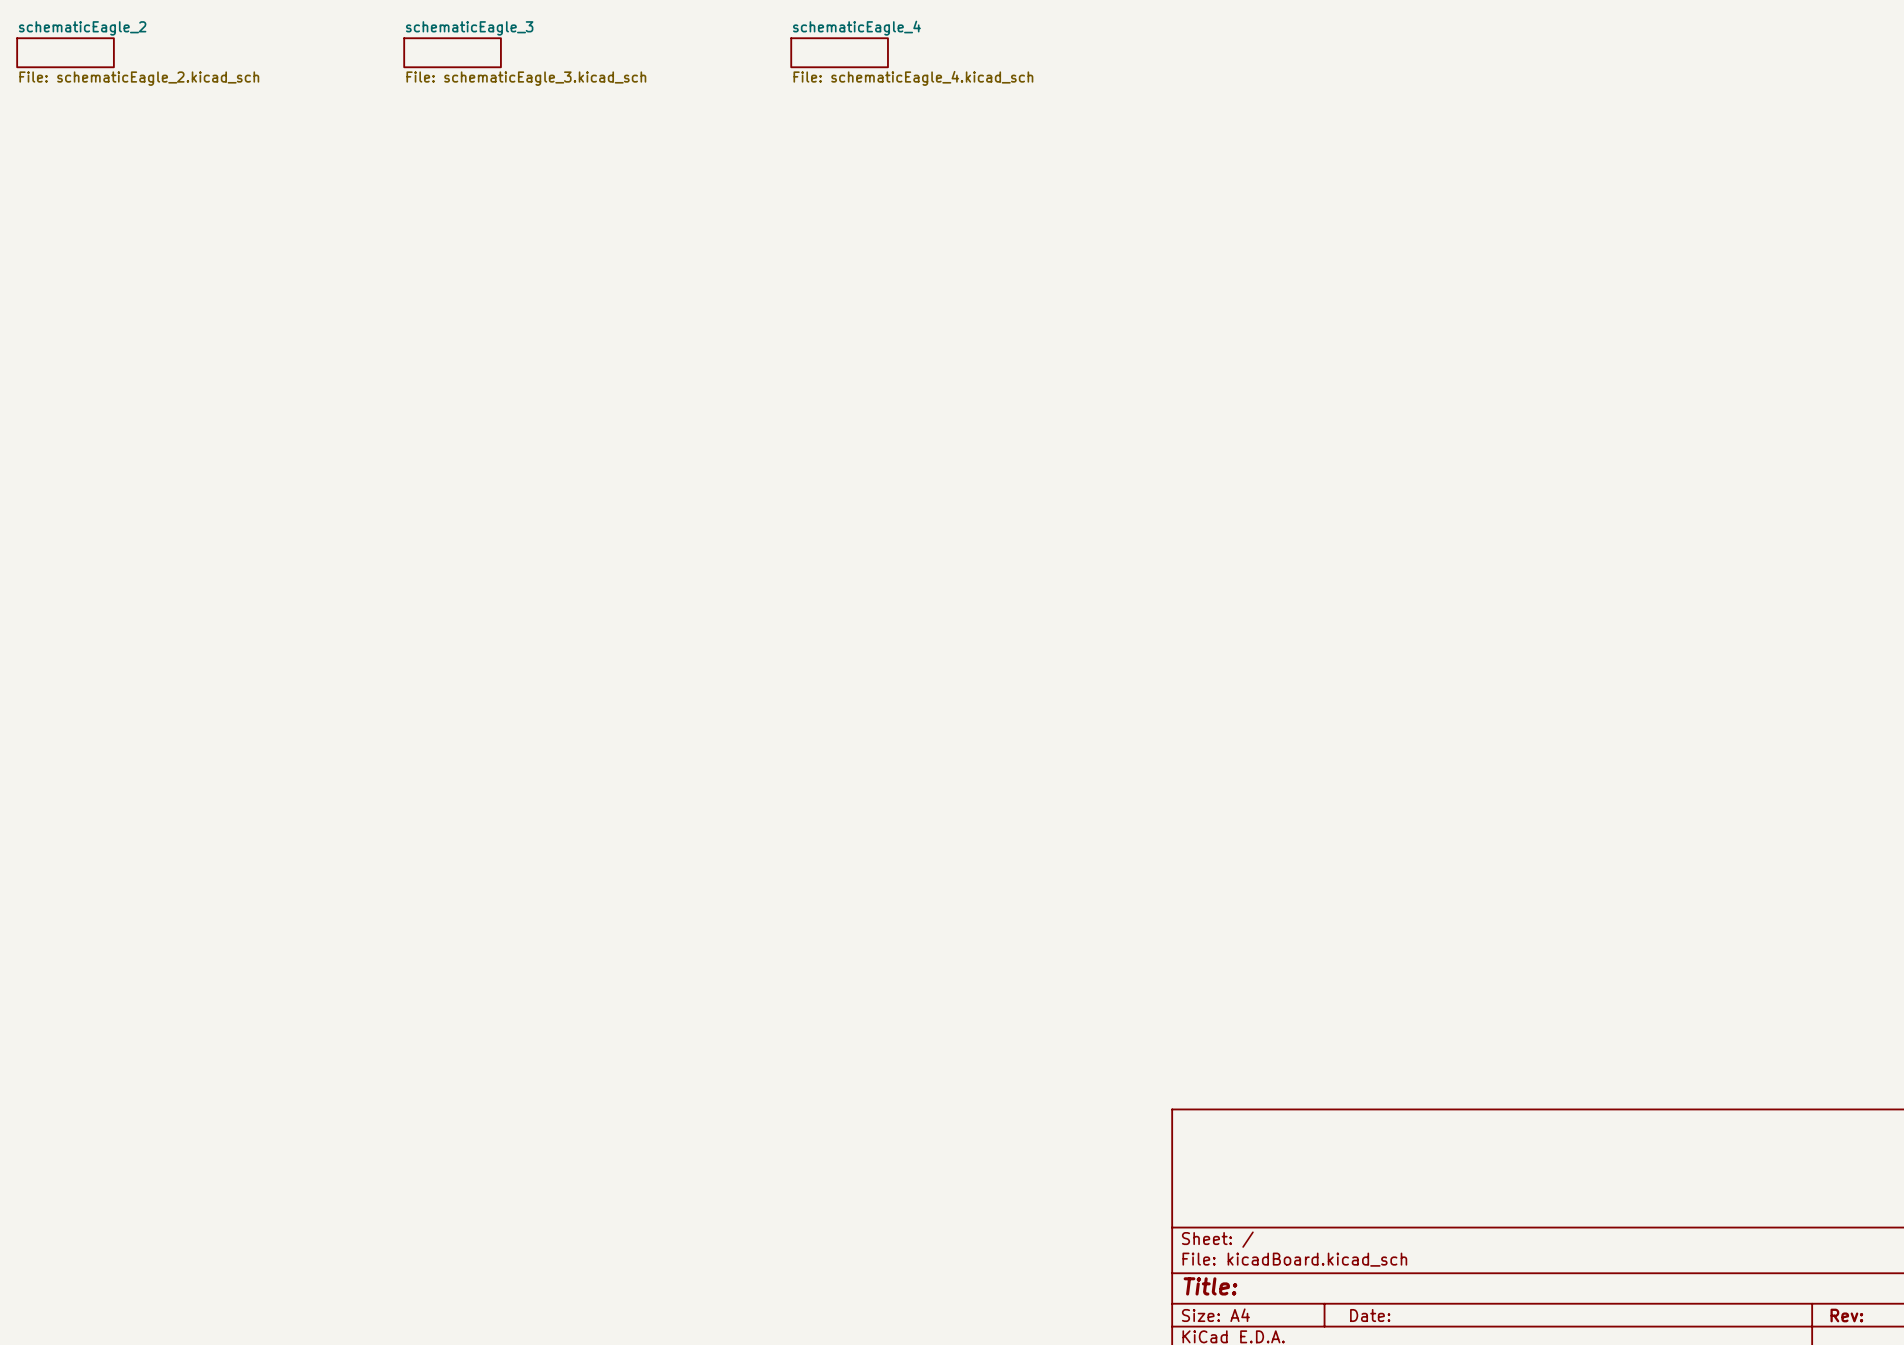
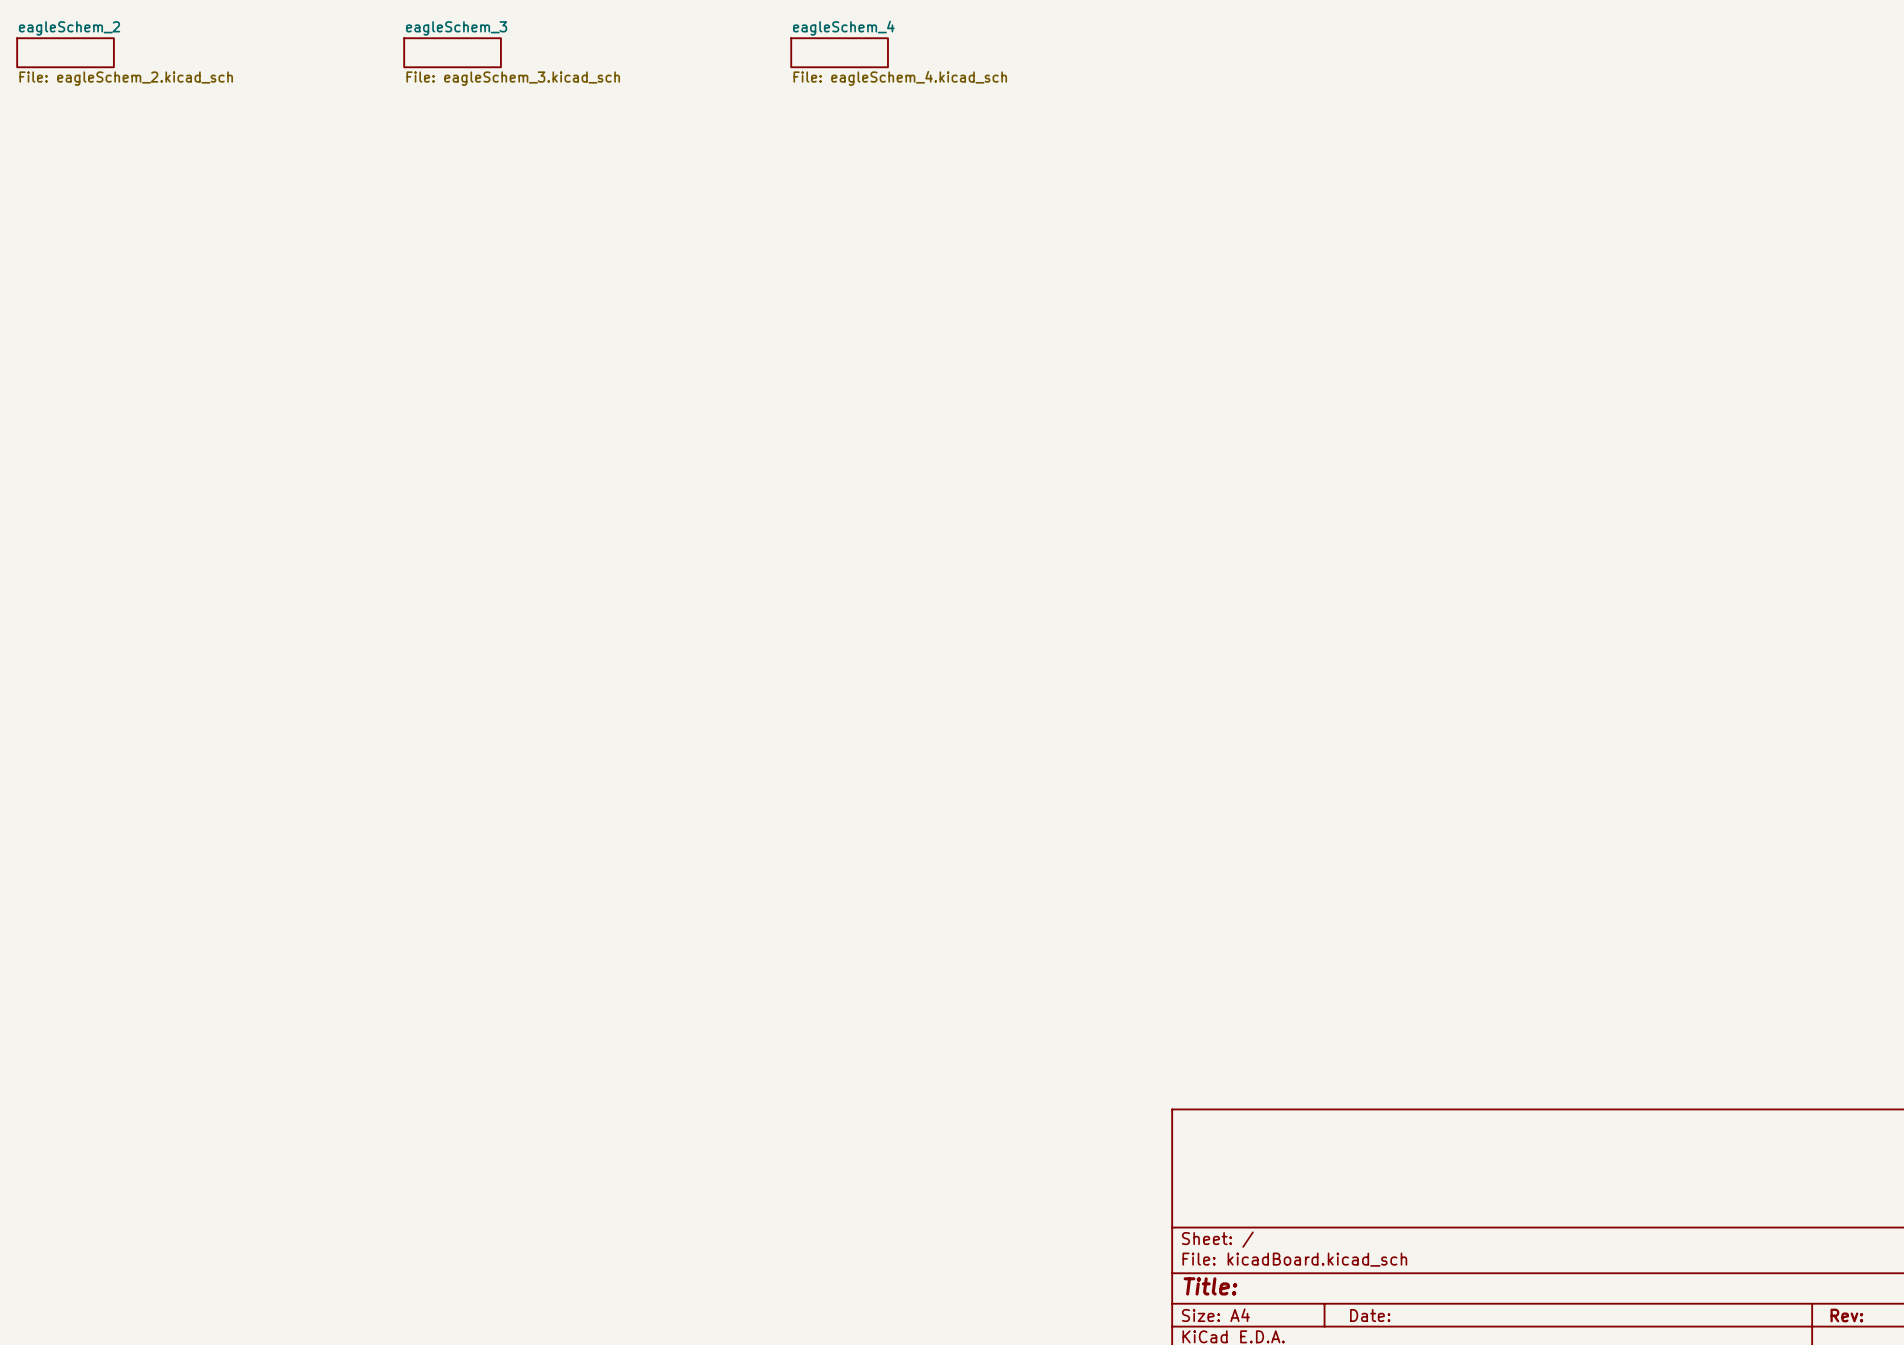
sheet schematicEagle_2 name: schematicEagle_2 (82, 28) -> eagleSchem_2 (69, 28)
sheet schematicEagle_3 name: schematicEagle_3 (469, 28) -> eagleSchem_3 (456, 28)
sheet schematicEagle_4 name: schematicEagle_4 (856, 28) -> eagleSchem_4 (843, 28)
sheet schematicEagle_2 value: File: schematicEagle_2.kicad_sch (139, 78) -> File: eagleSchem_2.kicad_sch (126, 78)
sheet schematicEagle_3 value: File: schematicEagle_3.kicad_sch (526, 78) -> File: eagleSchem_3.kicad_sch (513, 78)
sheet schematicEagle_4 value: File: schematicEagle_4.kicad_sch (913, 78) -> File: eagleSchem_4.kicad_sch (900, 78)

